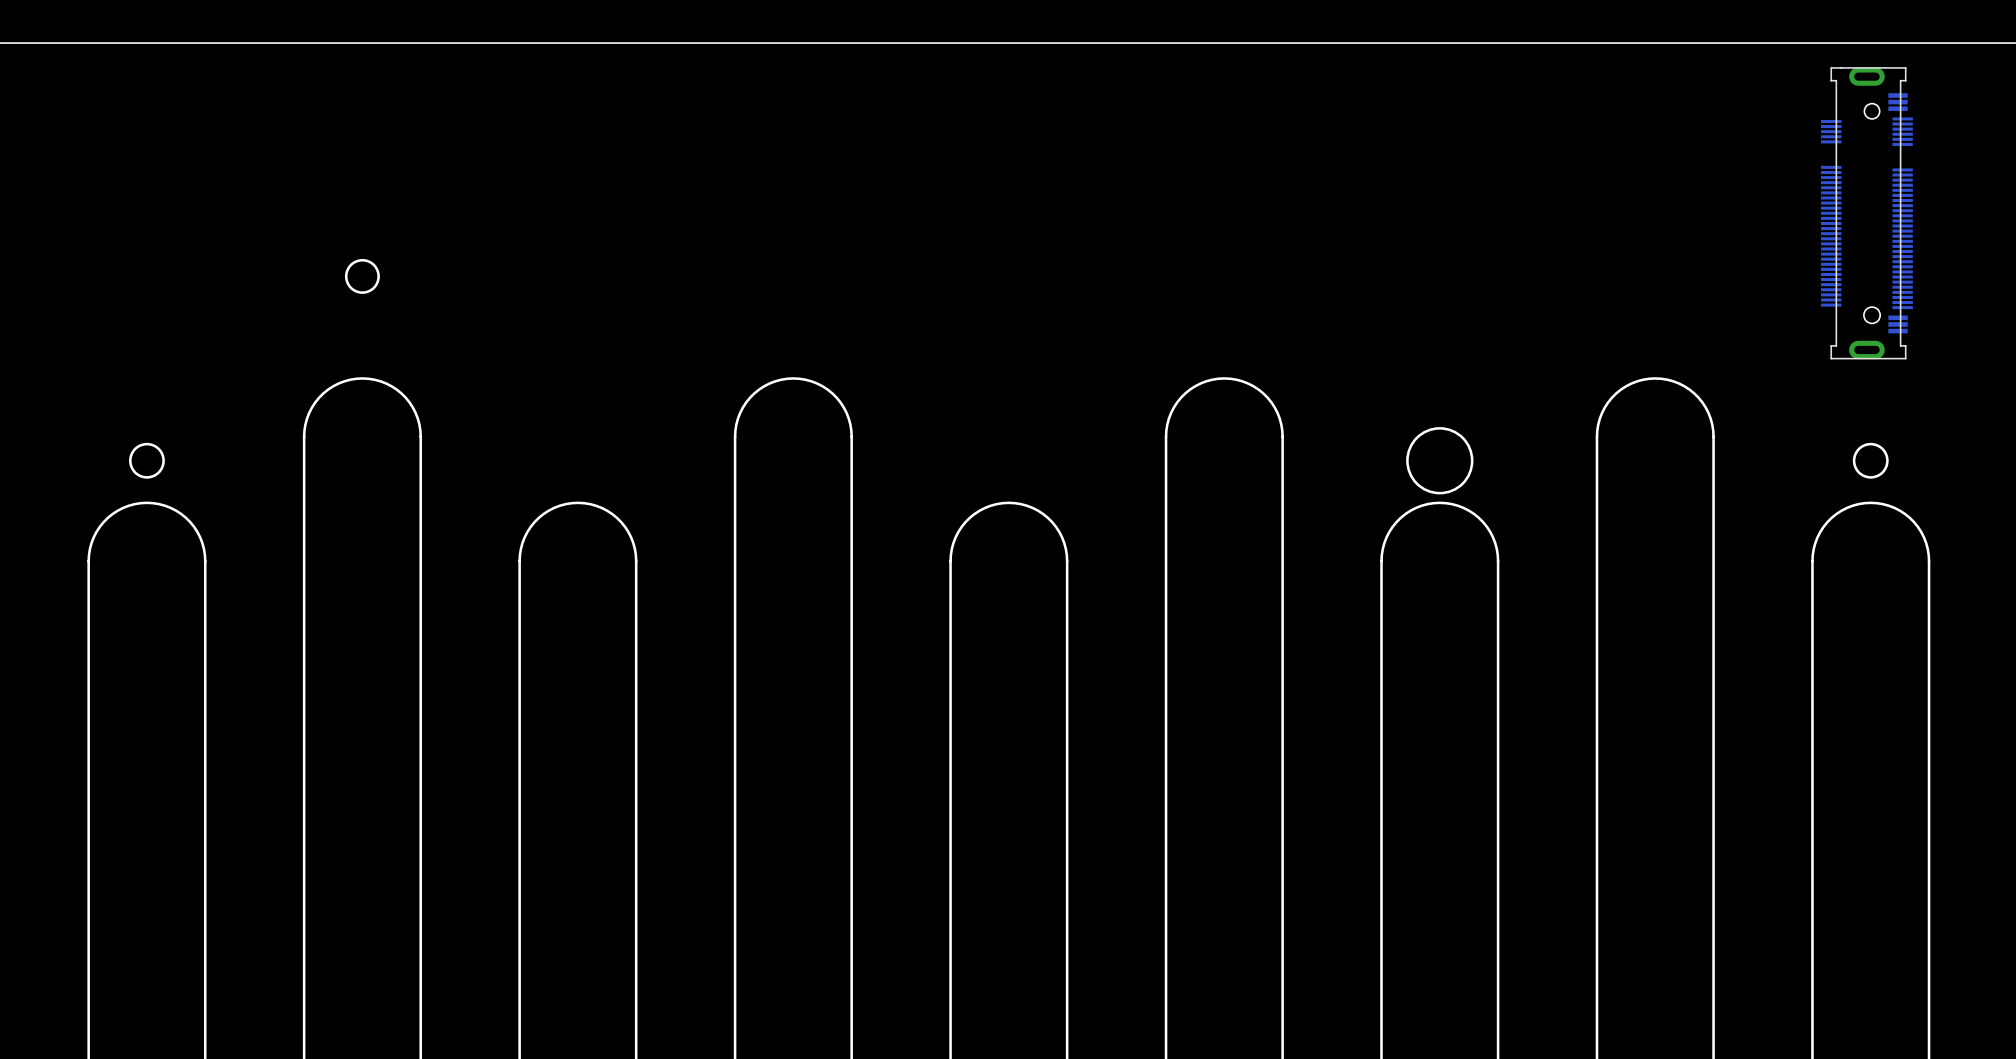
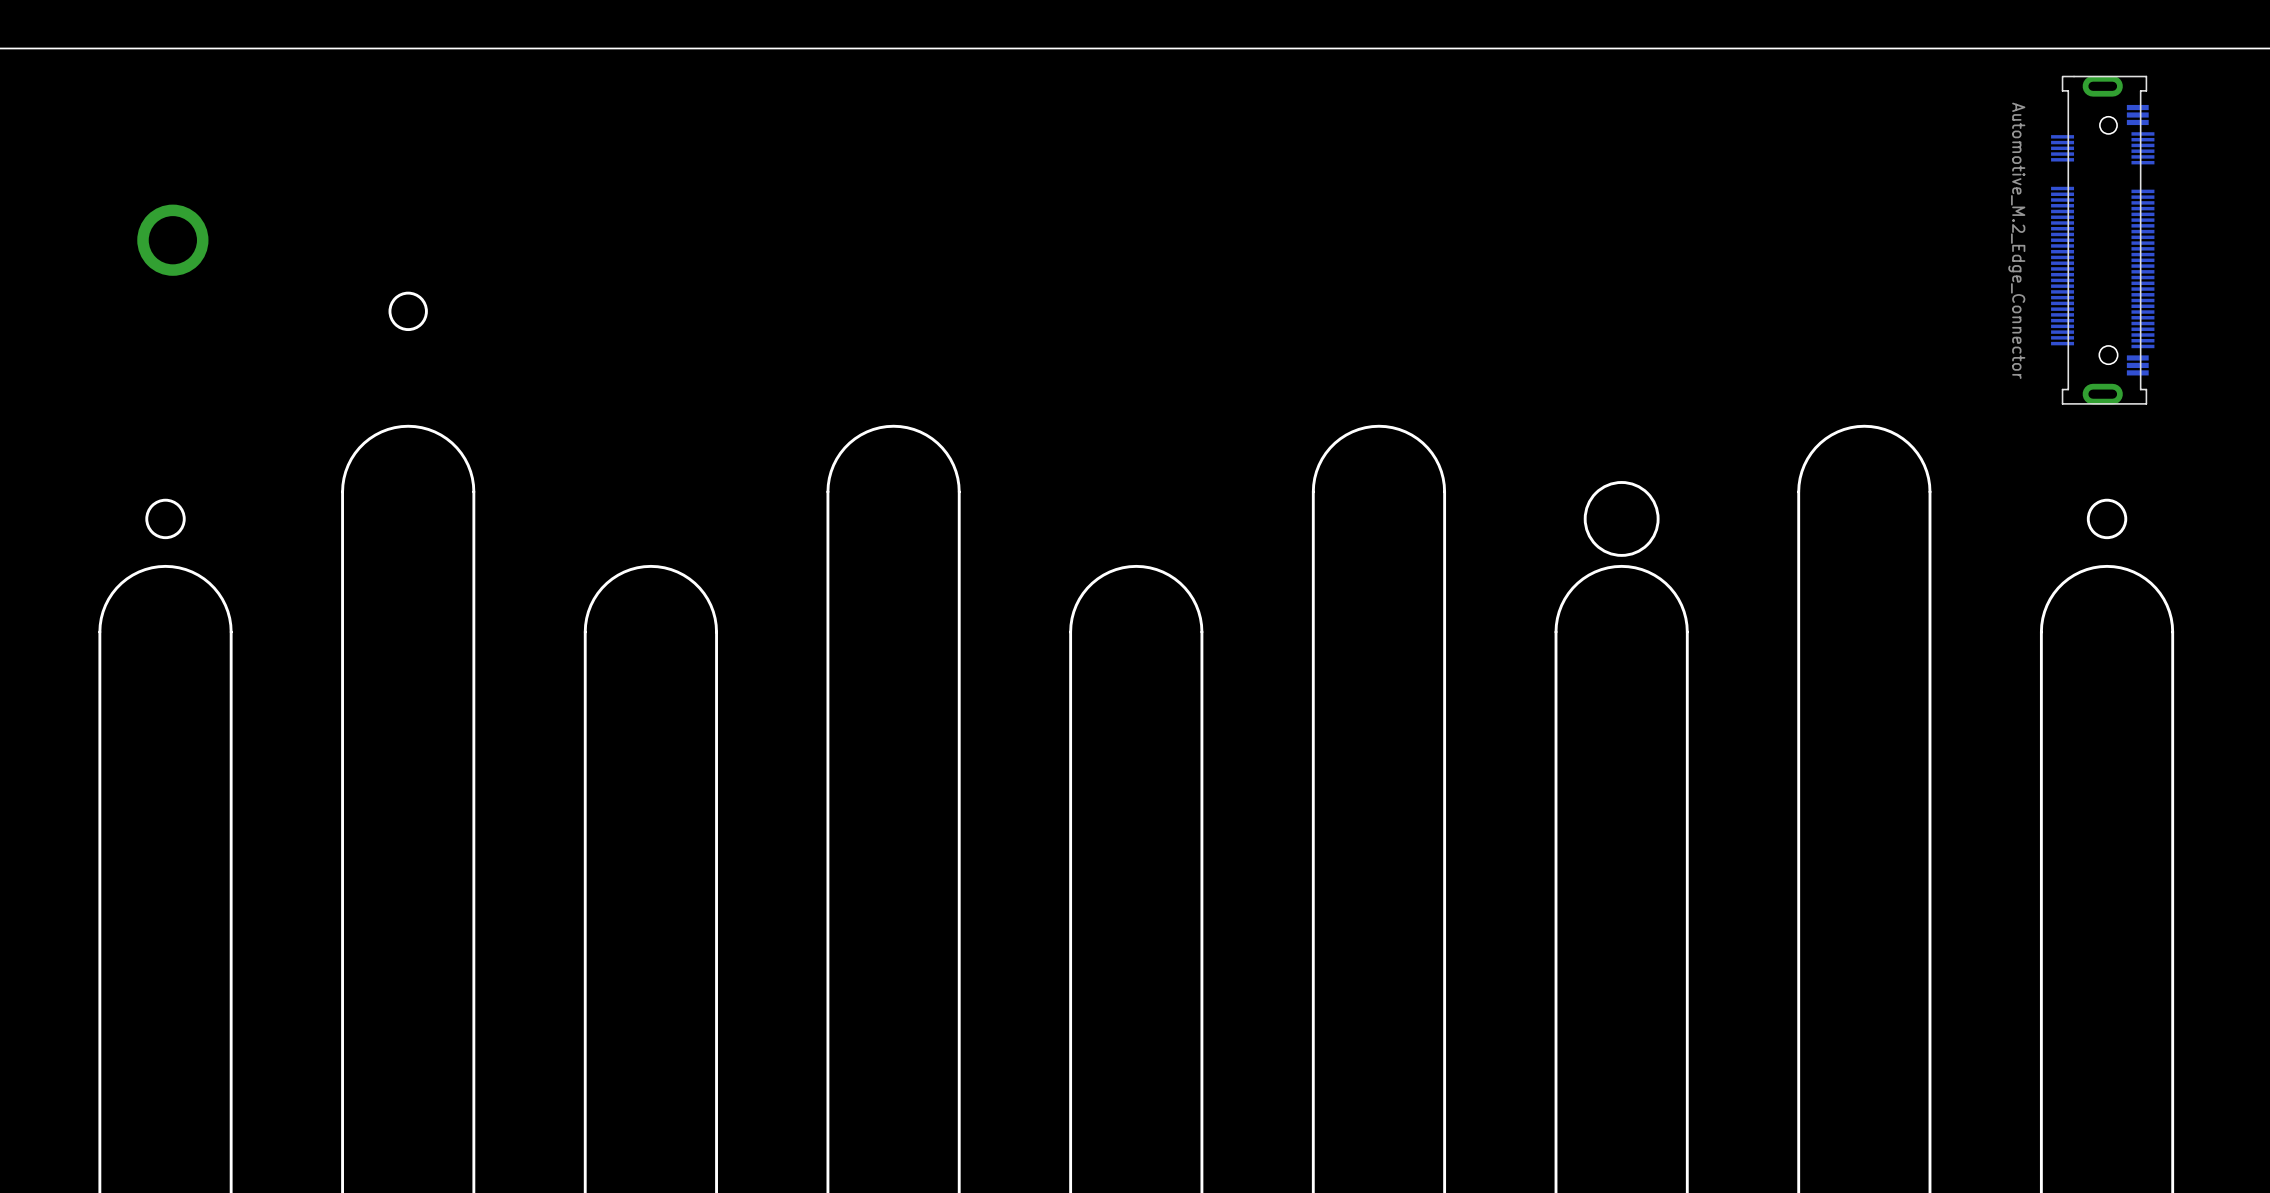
part: none -> Automotive_M.2_Edge_Connector (1145, 240)

